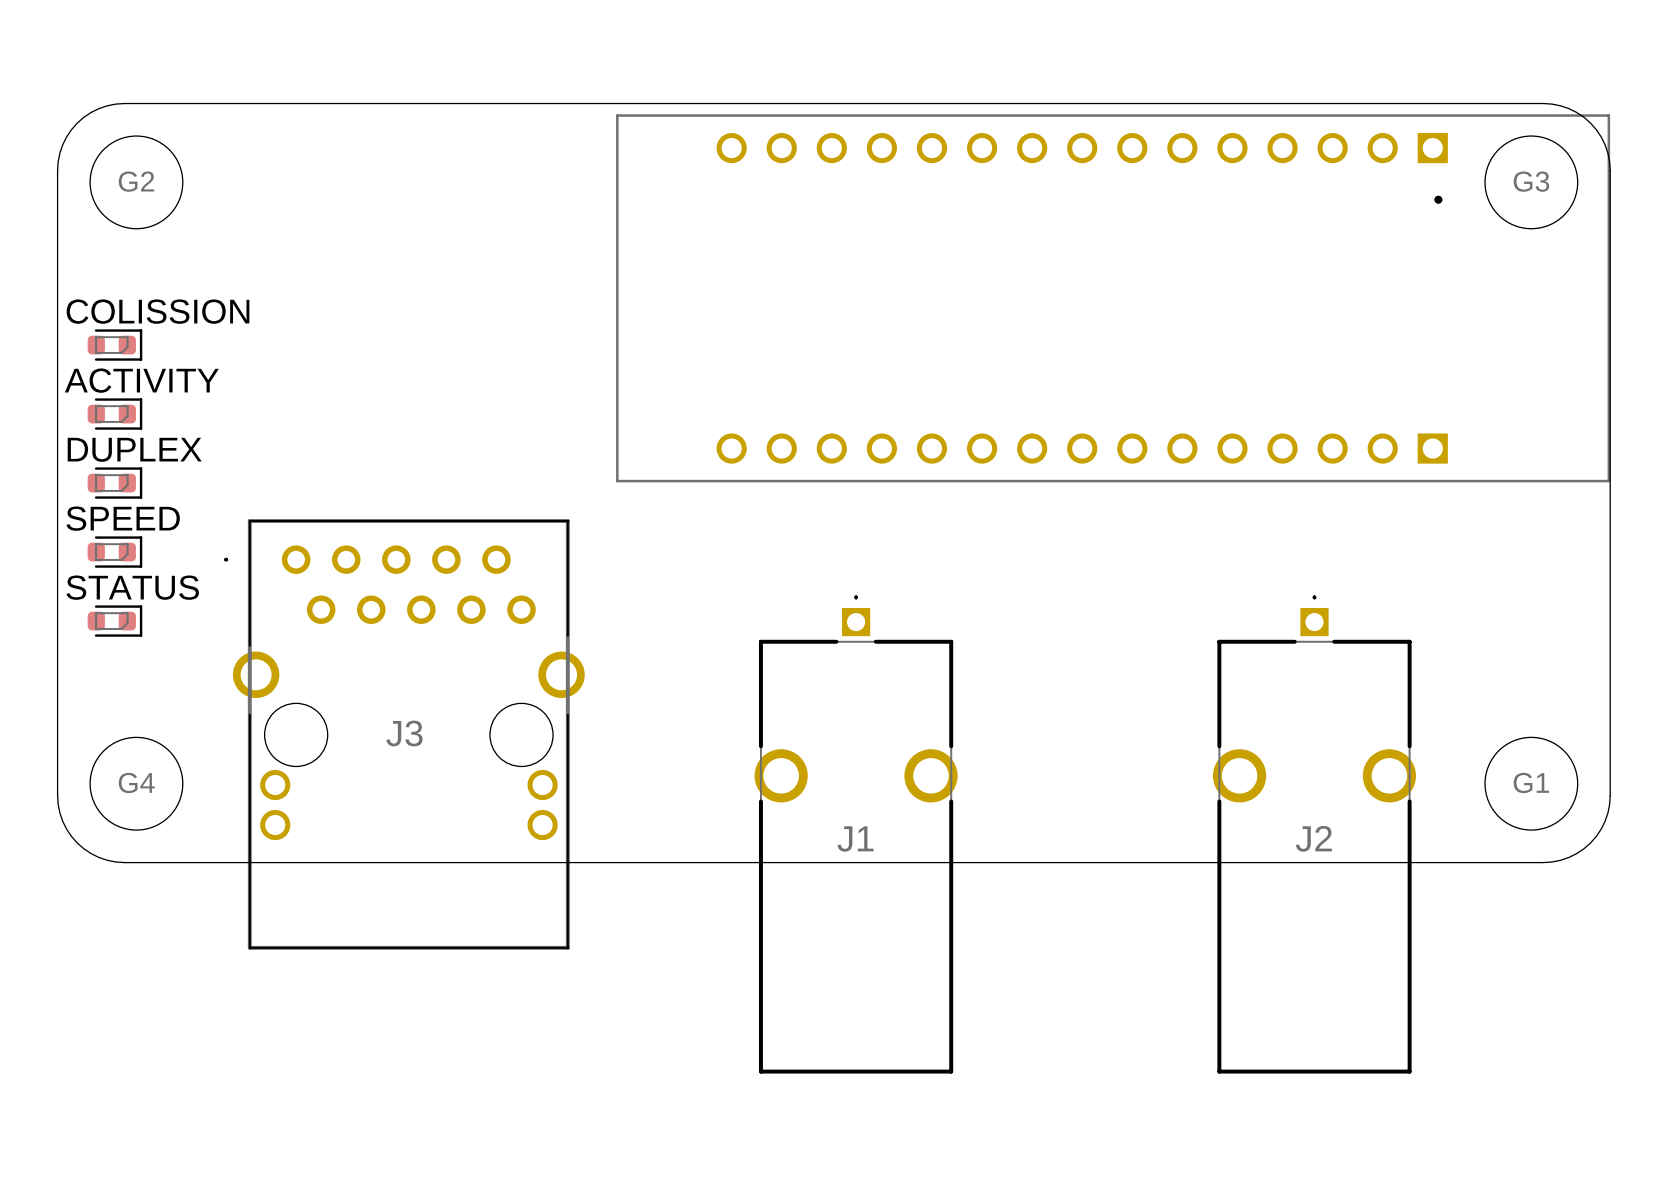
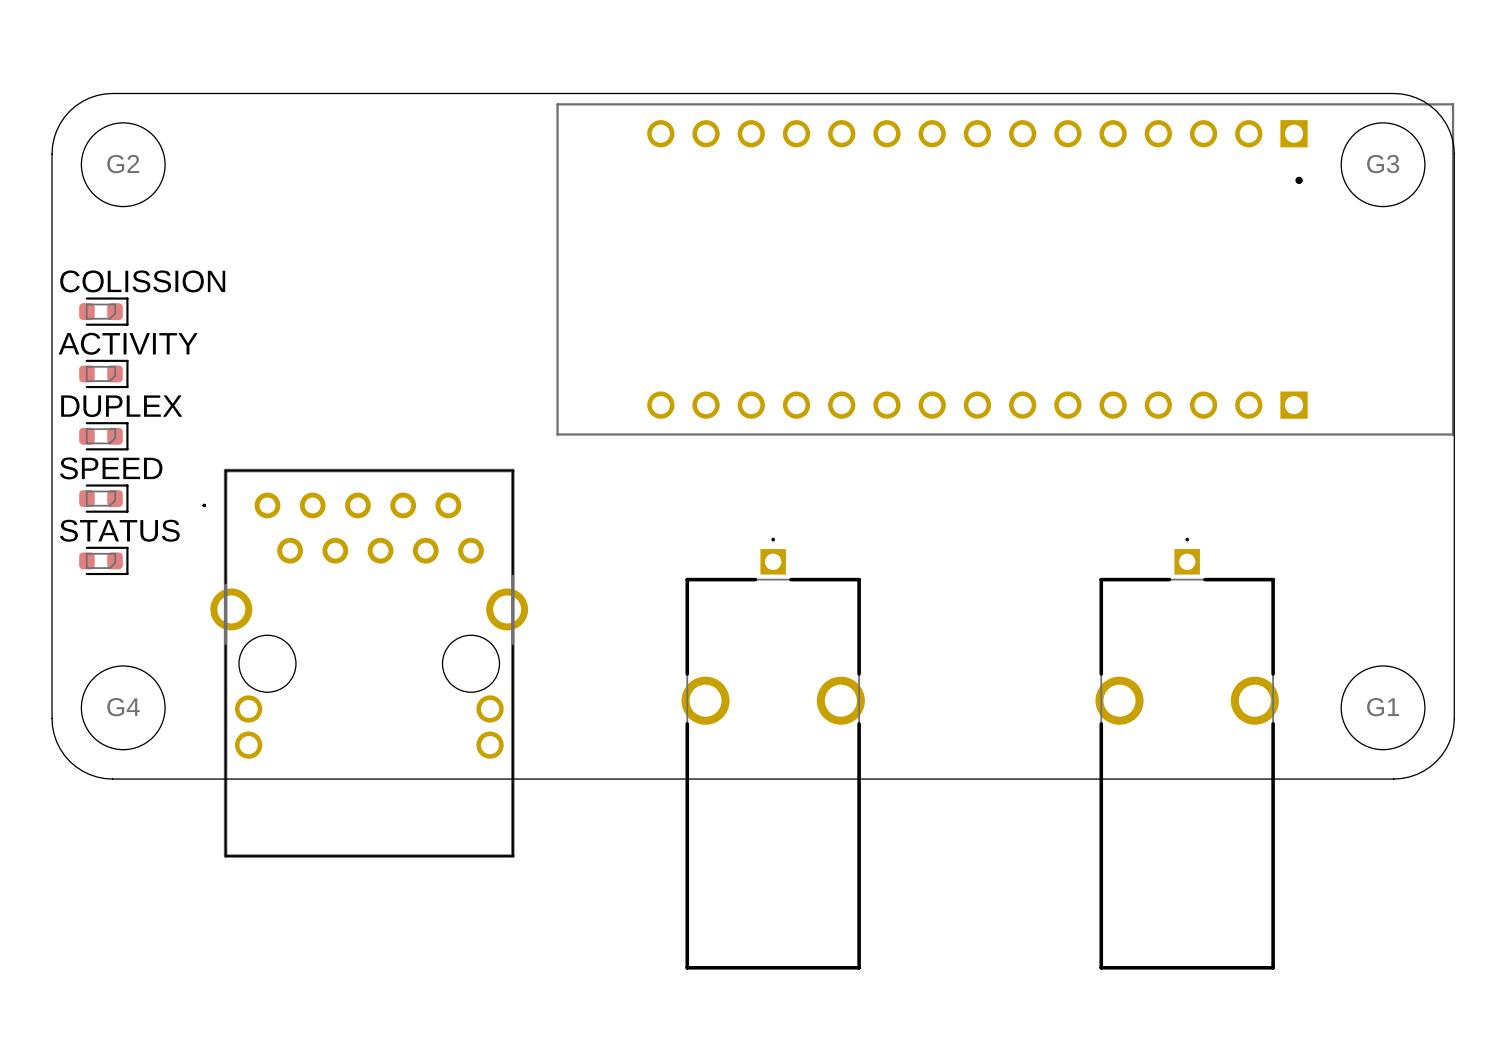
J3 name: J3 (404, 733) -> none
J2 name: J2 (1313, 838) -> none
J1 name: J1 (855, 839) -> none

